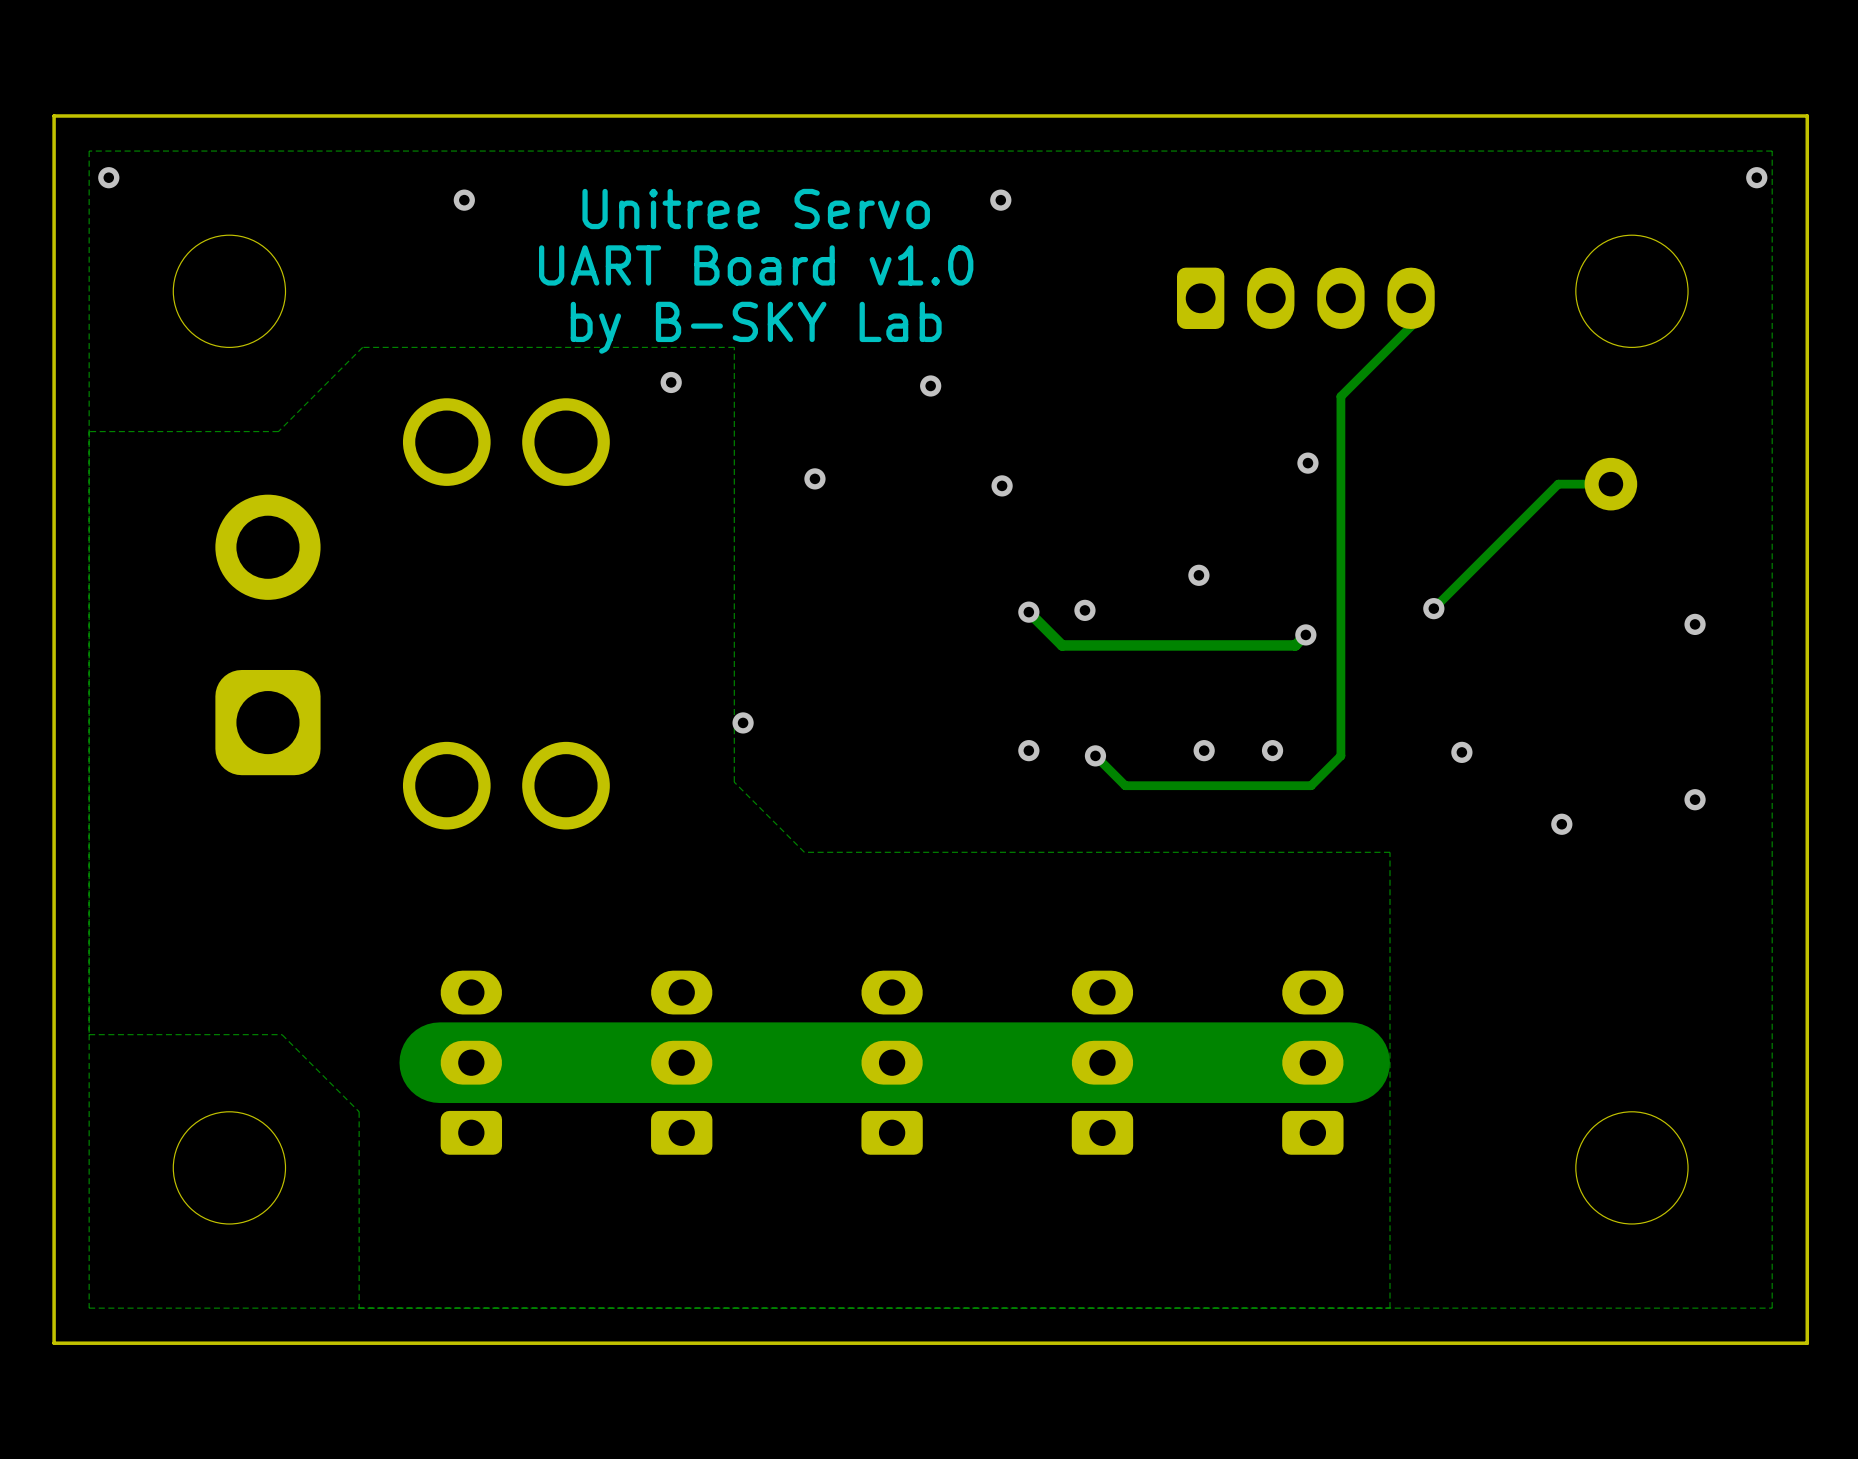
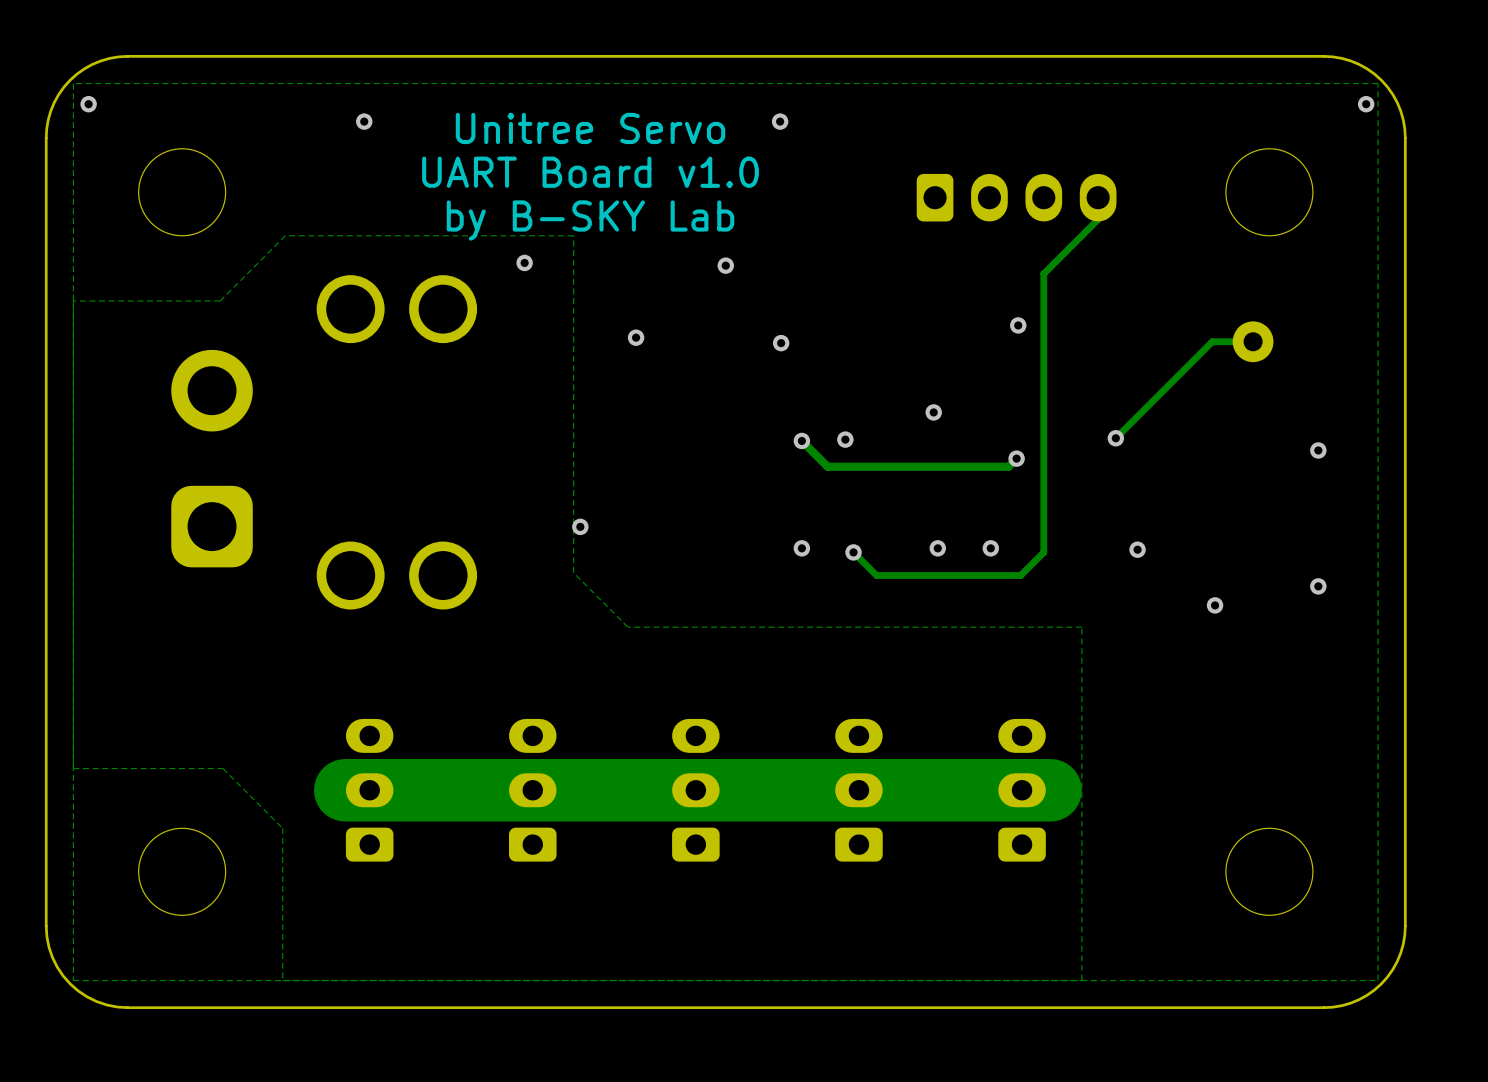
board edge: (159, 115) (54, 115) (54, 221) -> (127, 56) (100, 60) (84, 68) (70, 80) (54, 102) (48, 119) (46, 137)
board edge: (1702, 115) (1807, 115) (1807, 221) -> (1323, 56) (1341, 58) (1359, 64) (1381, 80) (1392, 94) (1400, 110) (1405, 137)
board edge: (54, 1238) (54, 1343) (159, 1343) -> (46, 926) (52, 957) (70, 983) (96, 1001) (127, 1007)
board edge: (1807, 1238) (1807, 1343) (1702, 1343) -> (1405, 926) (1403, 944) (1397, 961) (1381, 983) (1359, 999) (1341, 1005) (1323, 1007)

